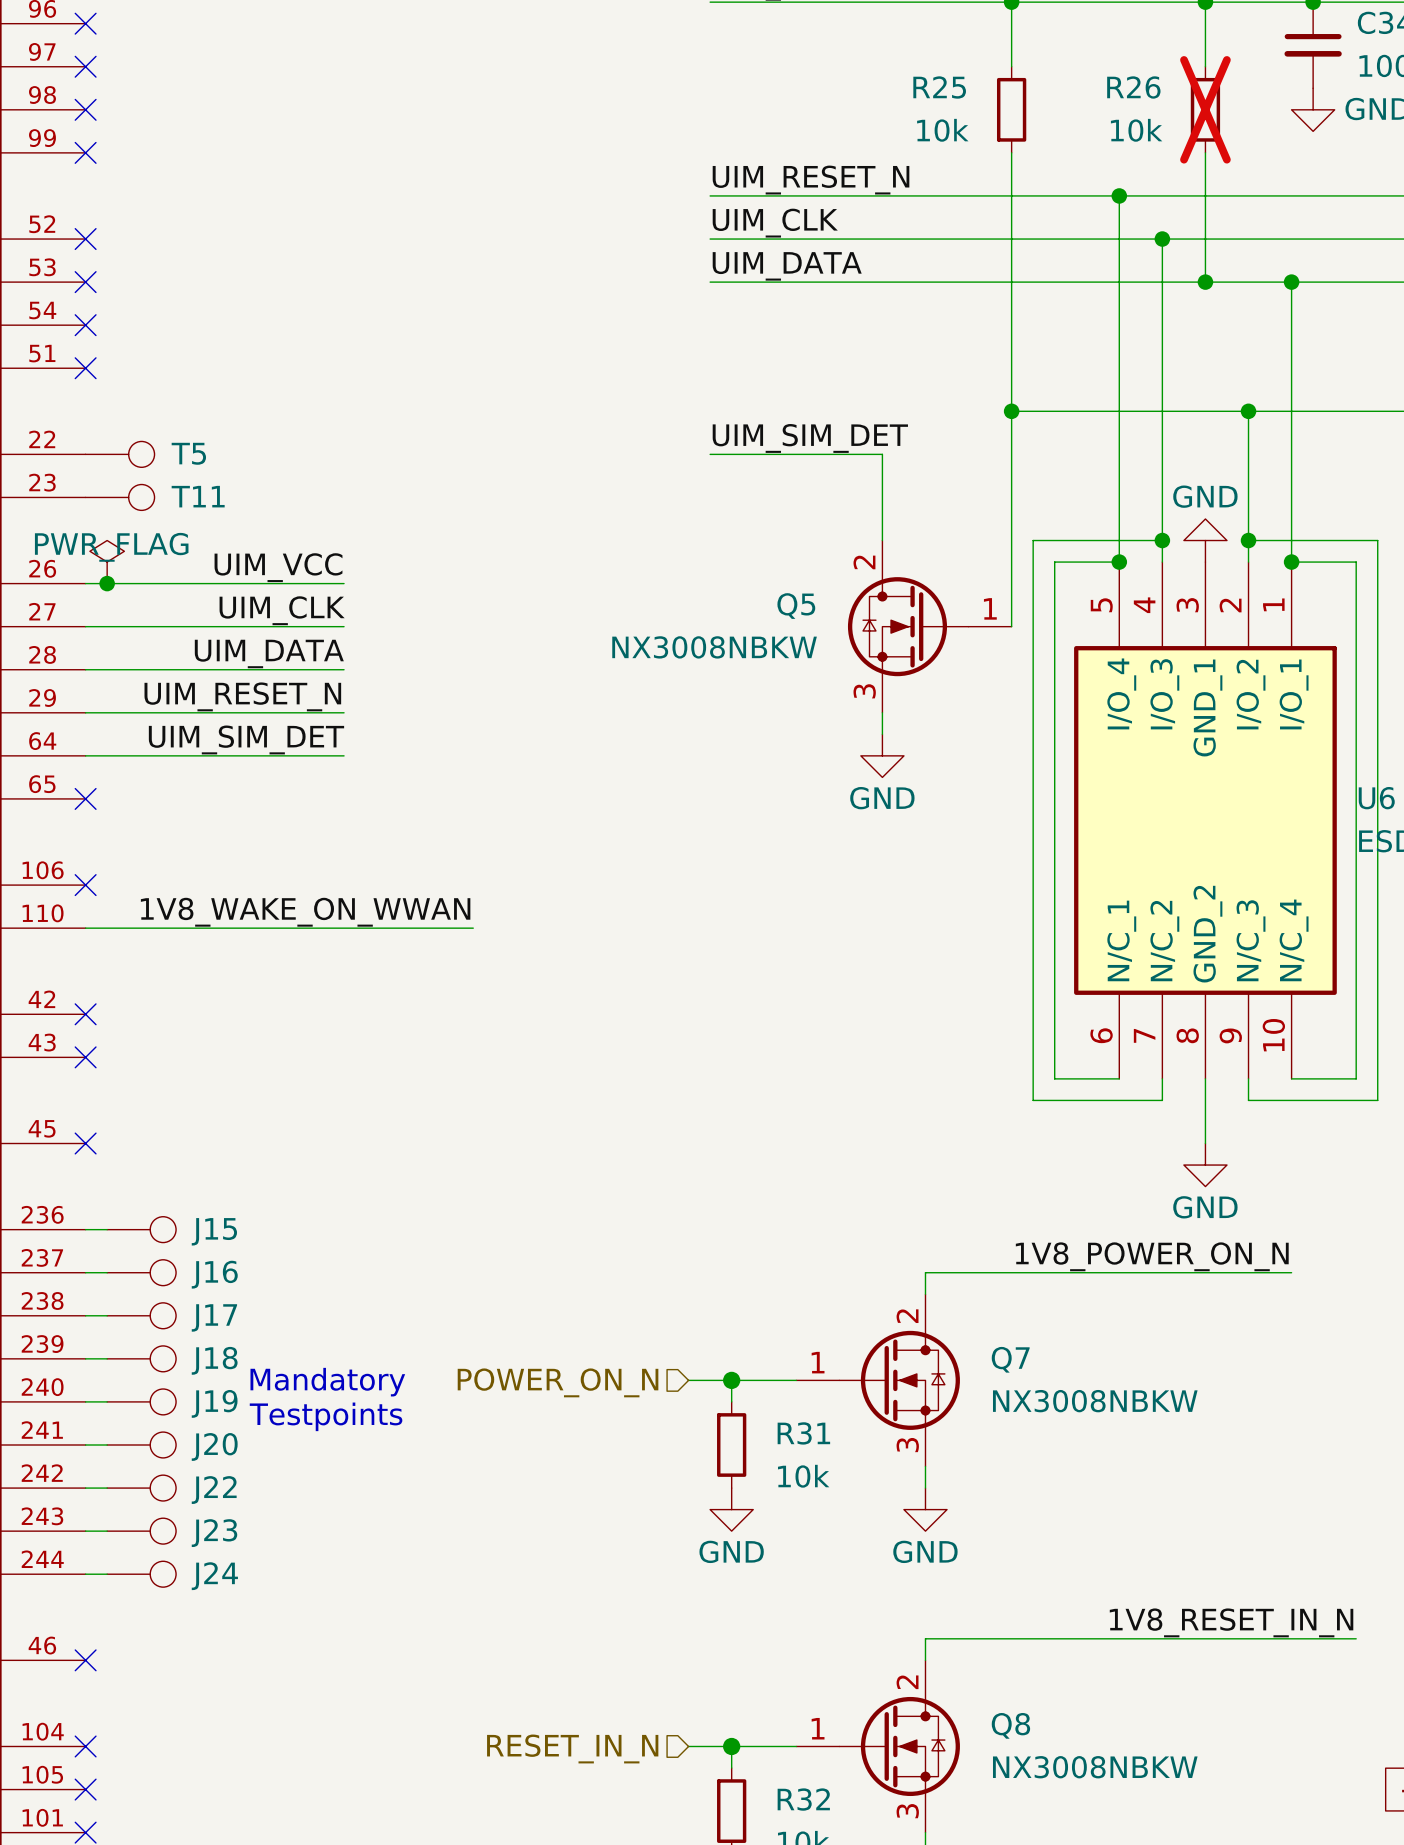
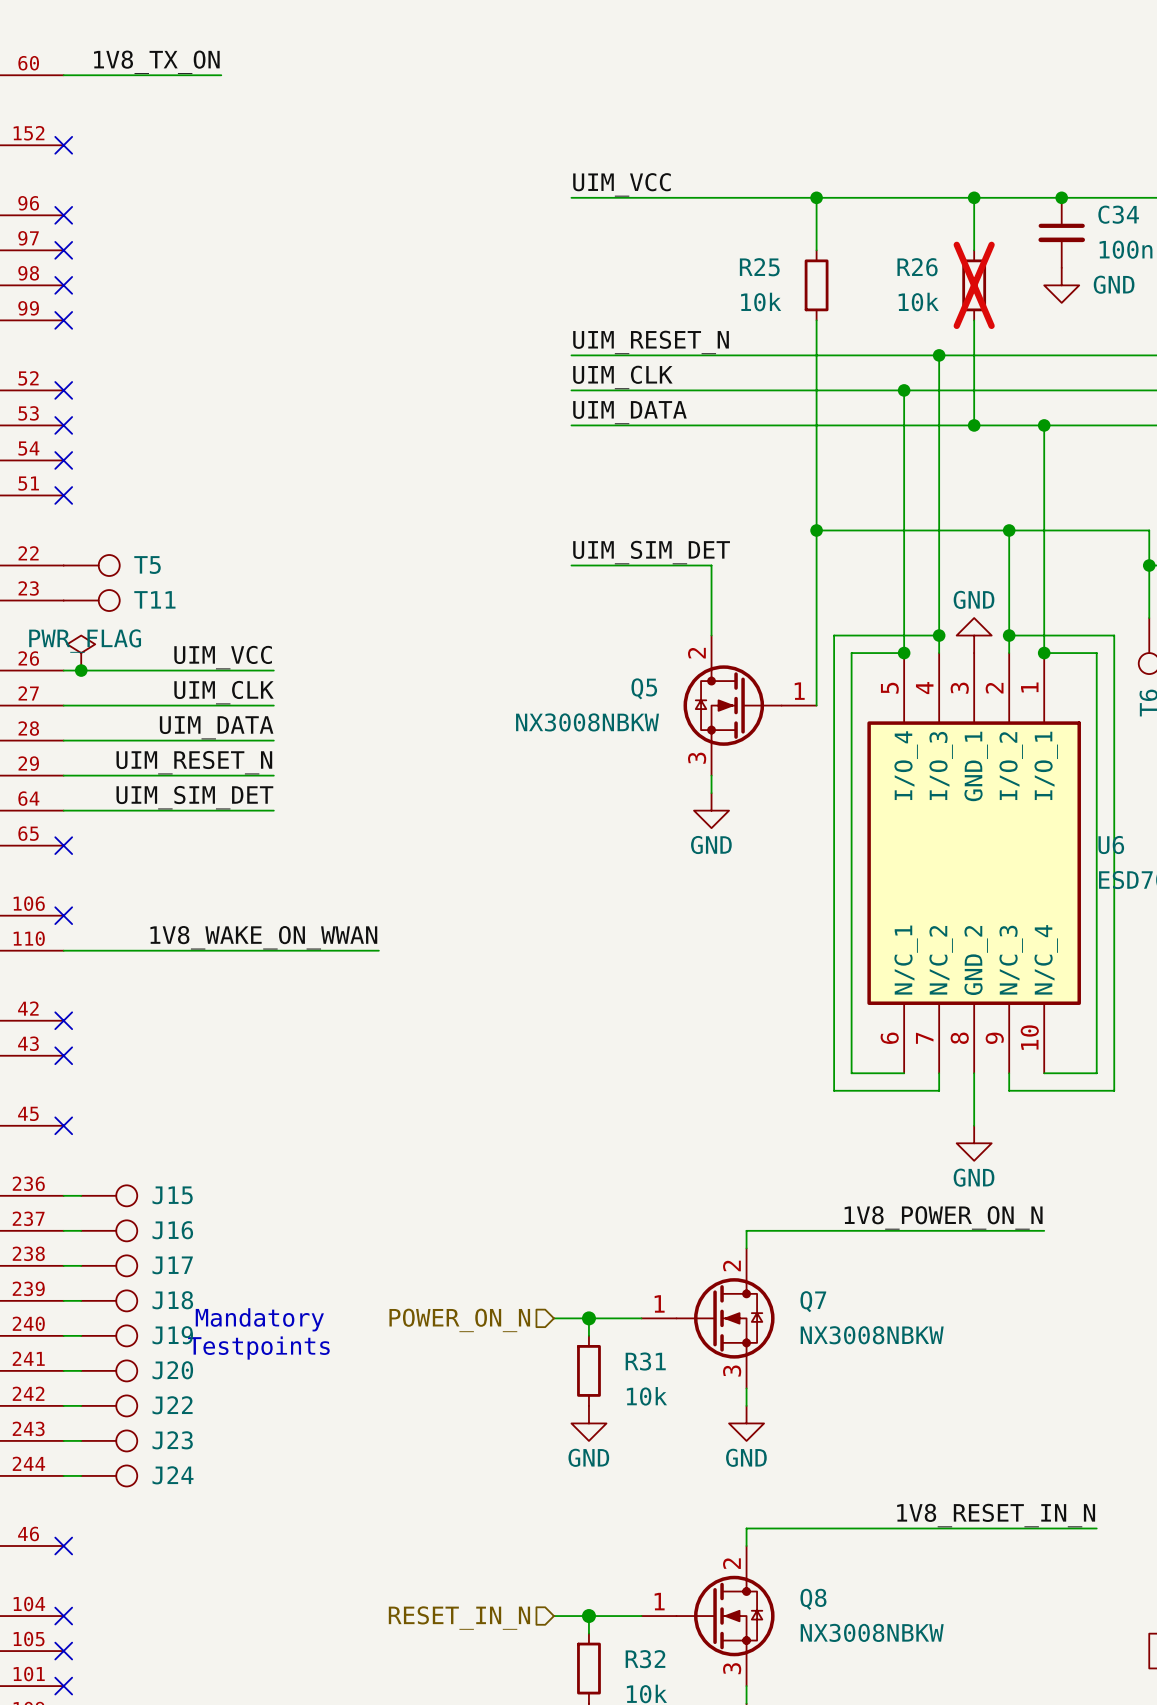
wire: (1119, 195) (1119, 239) -> (939, 355) (939, 390)
junction: (1119, 195) -> none
junction: none -> (939, 355)
junction: none -> (904, 390)
junction: (1162, 239) -> none

